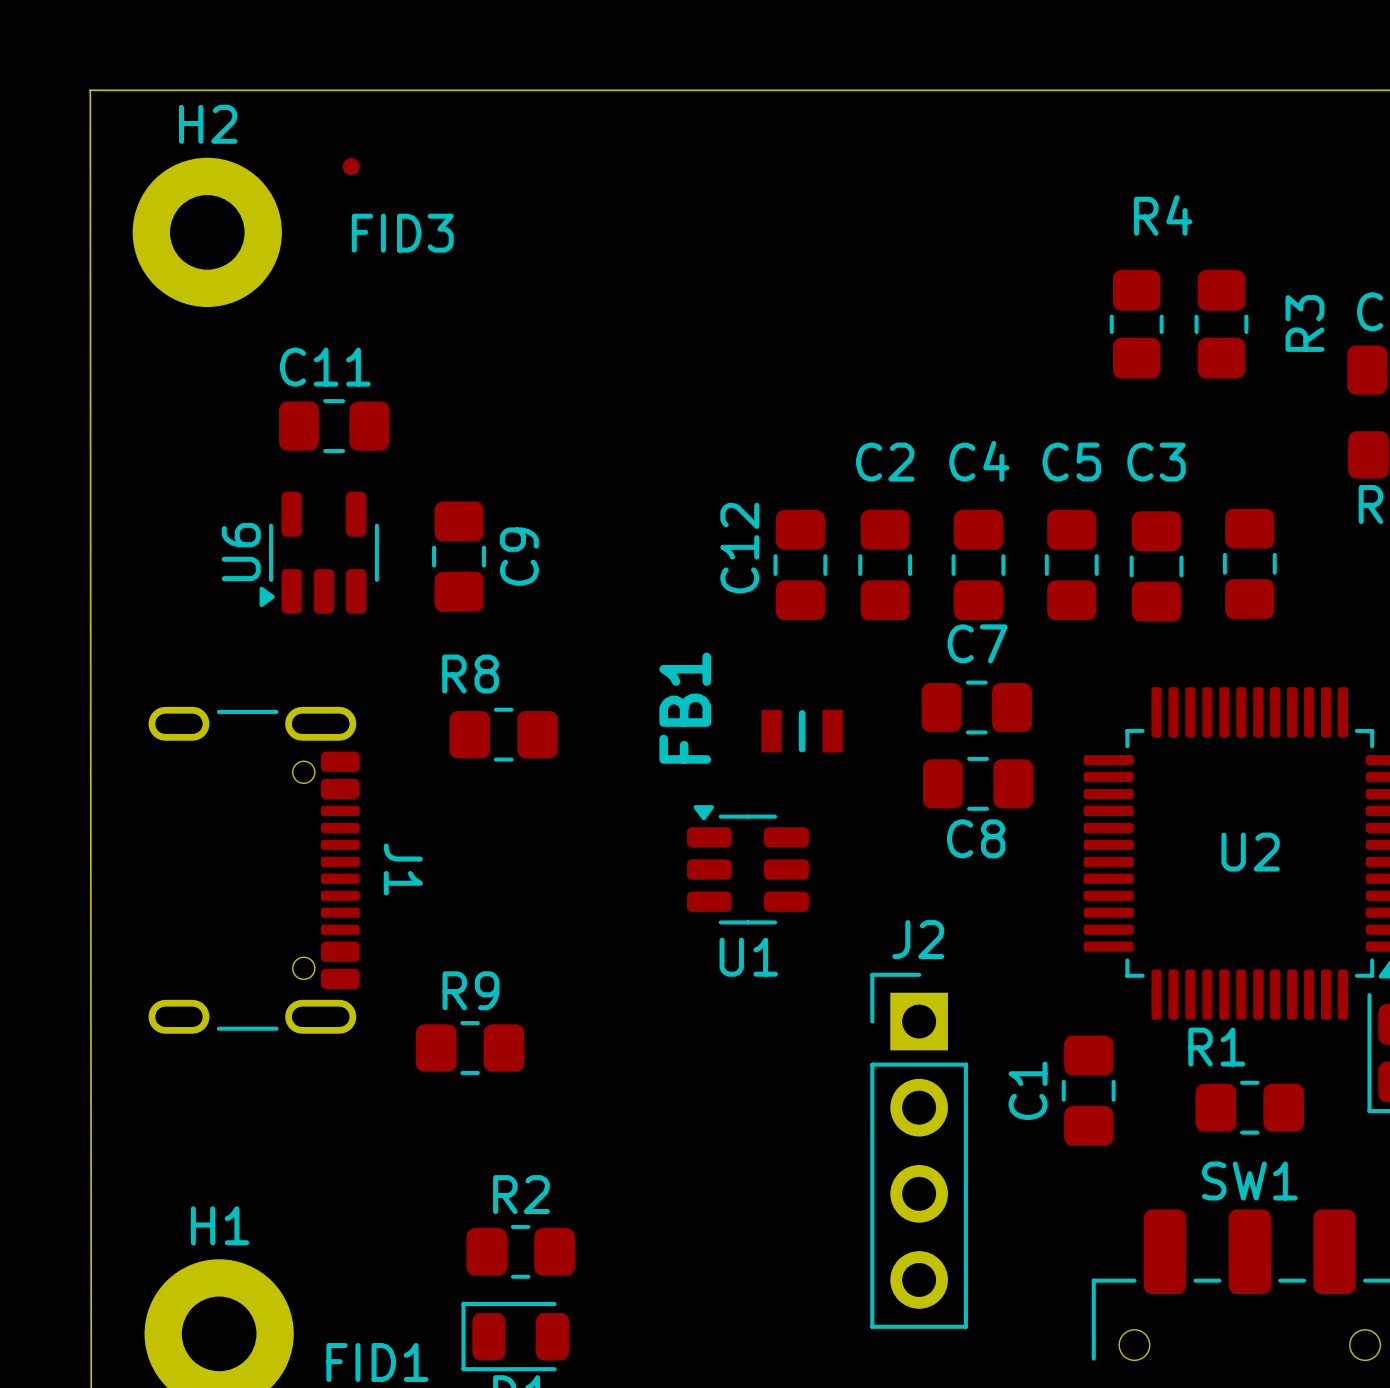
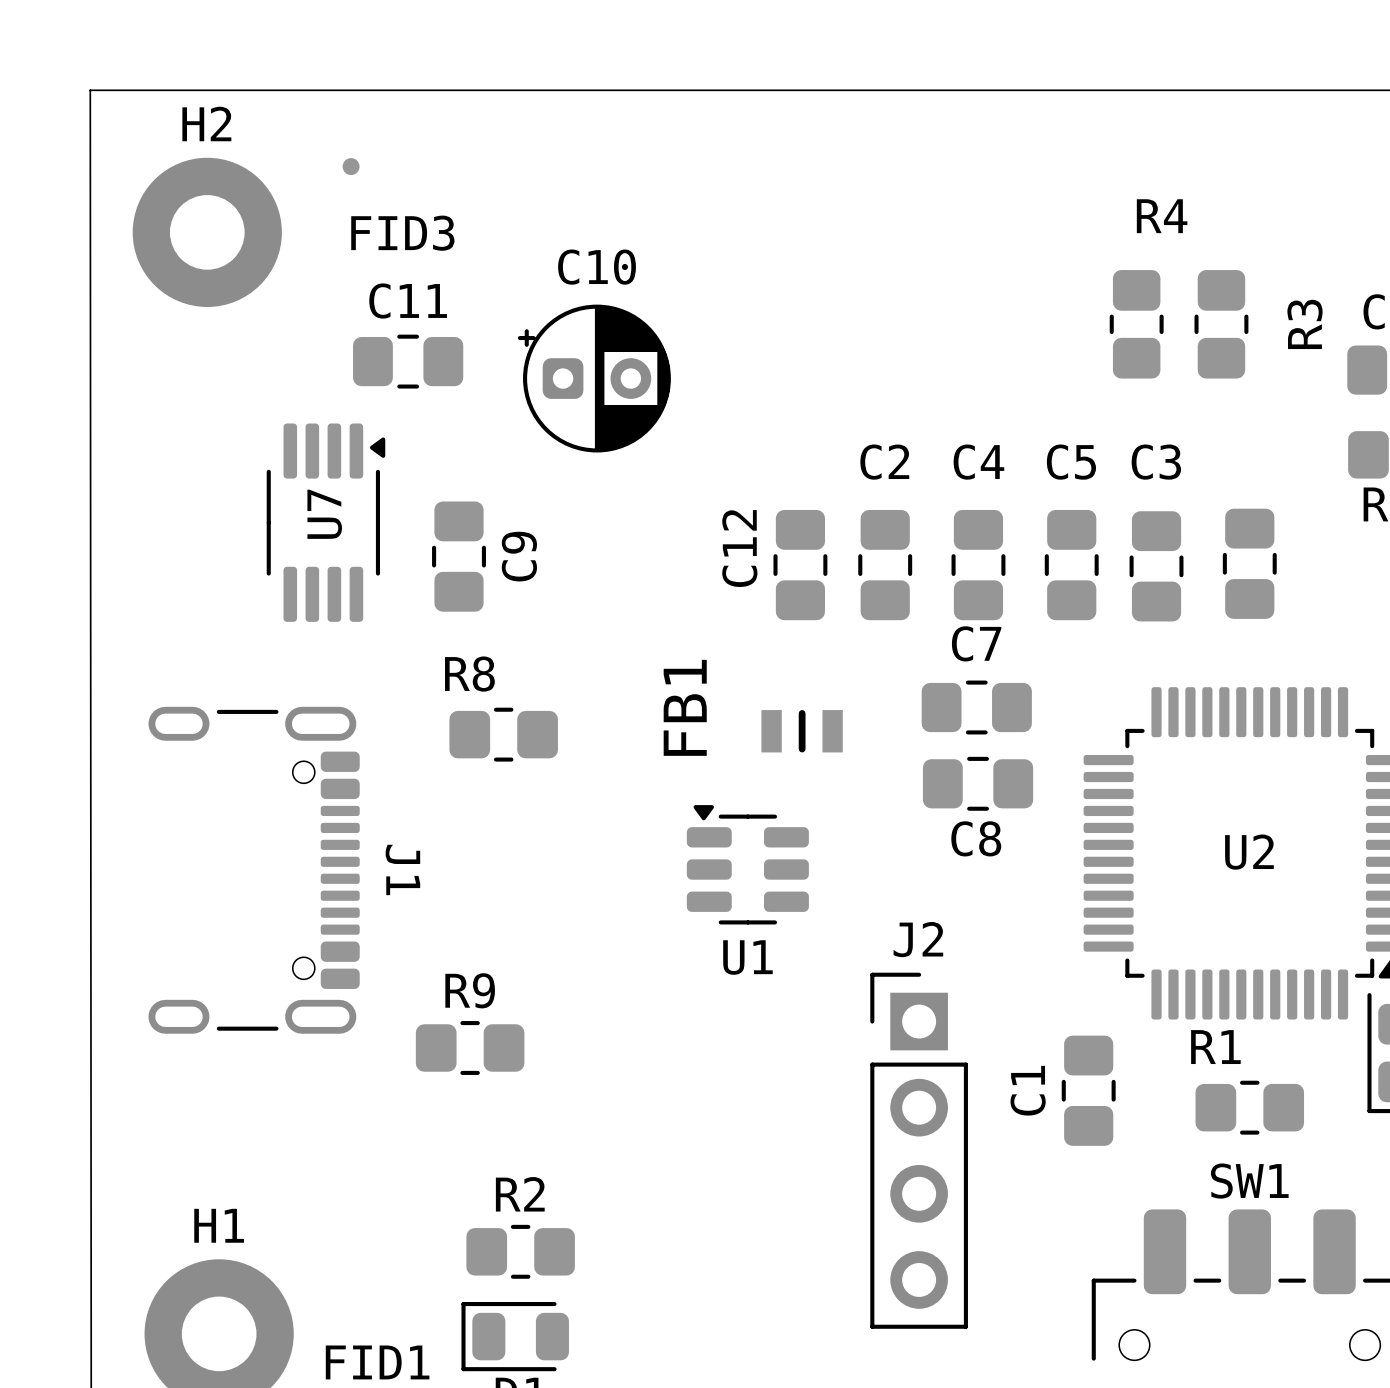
C11 name position: C11 (325, 367) -> C11 (408, 301)
C10: none -> (594, 378)
C11 position: (334, 426) -> (408, 361)
U7: none -> (325, 522)
U6: (319, 552) -> none

